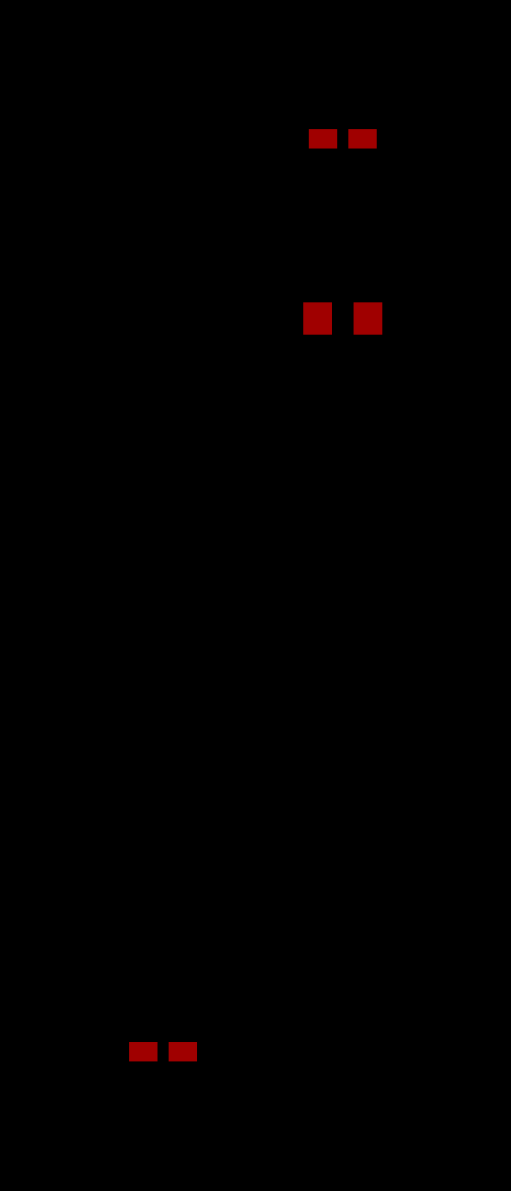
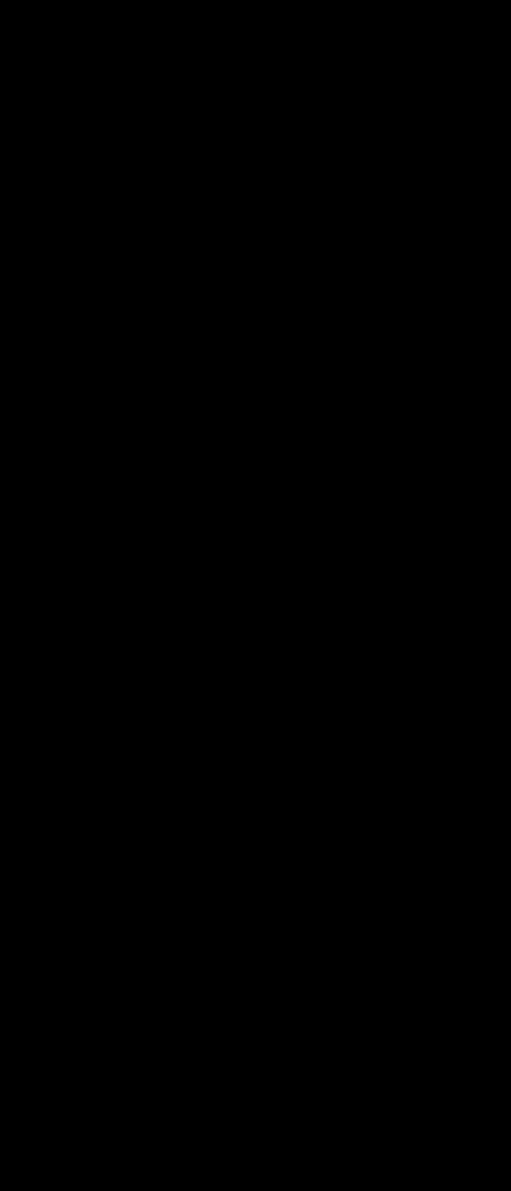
part: (342, 138) -> none
part: (342, 318) -> none
part: (163, 1051) -> none

